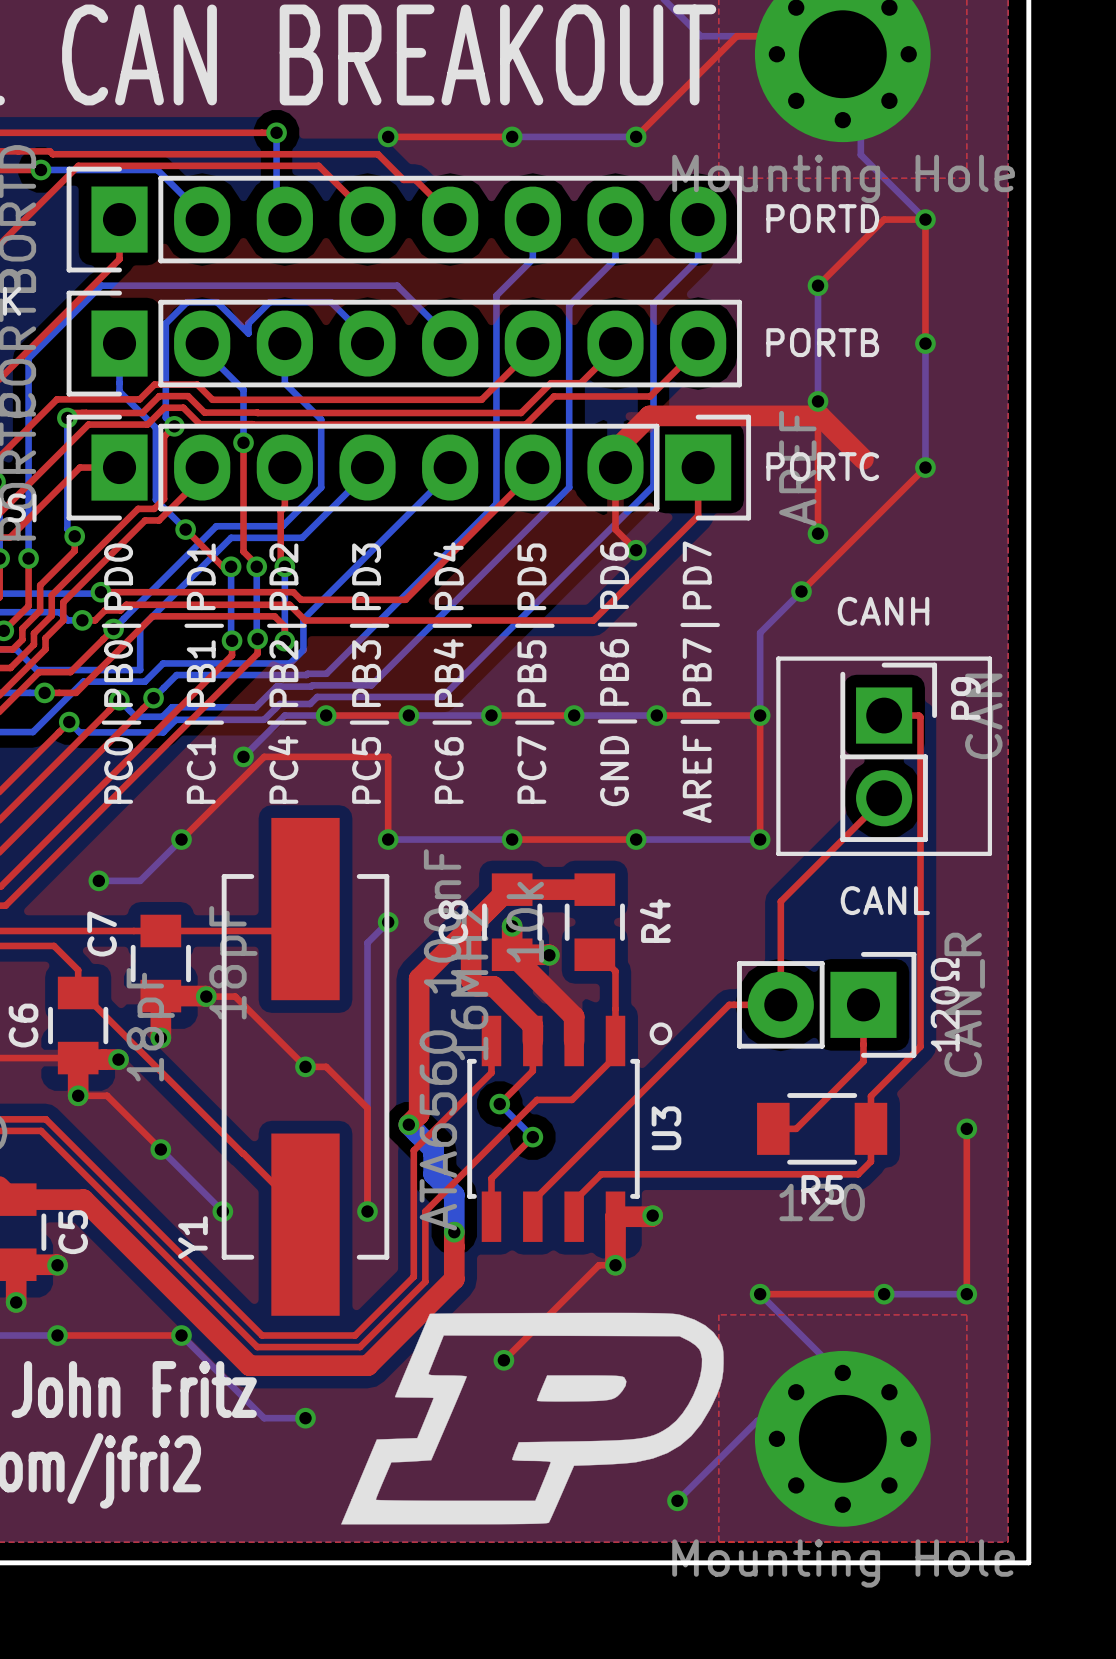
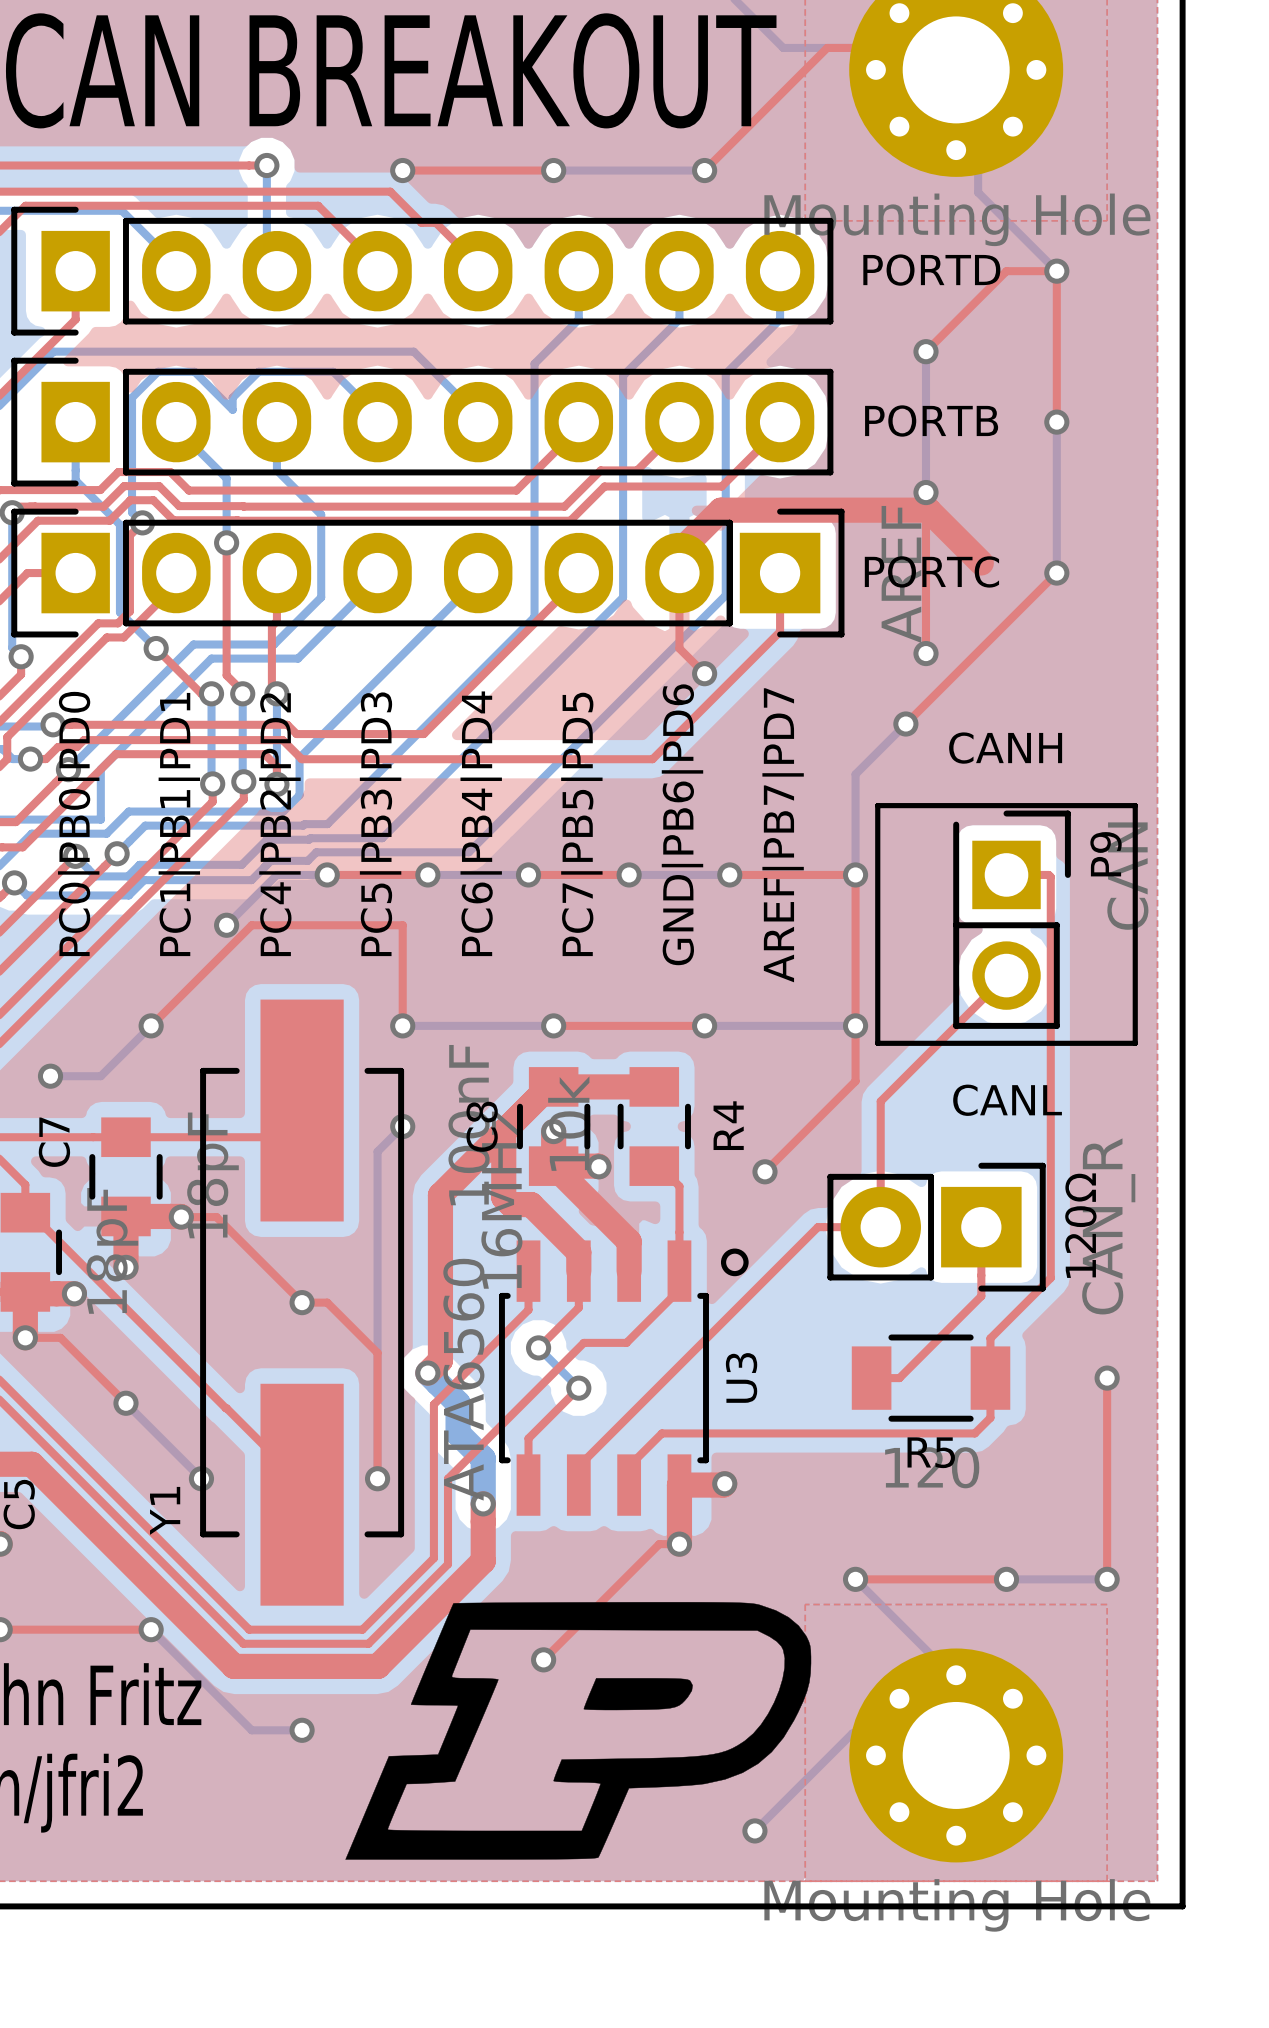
top track: none -> (855, 1025) (855, 1081) (764, 1171)
via: none -> (764, 1171)

